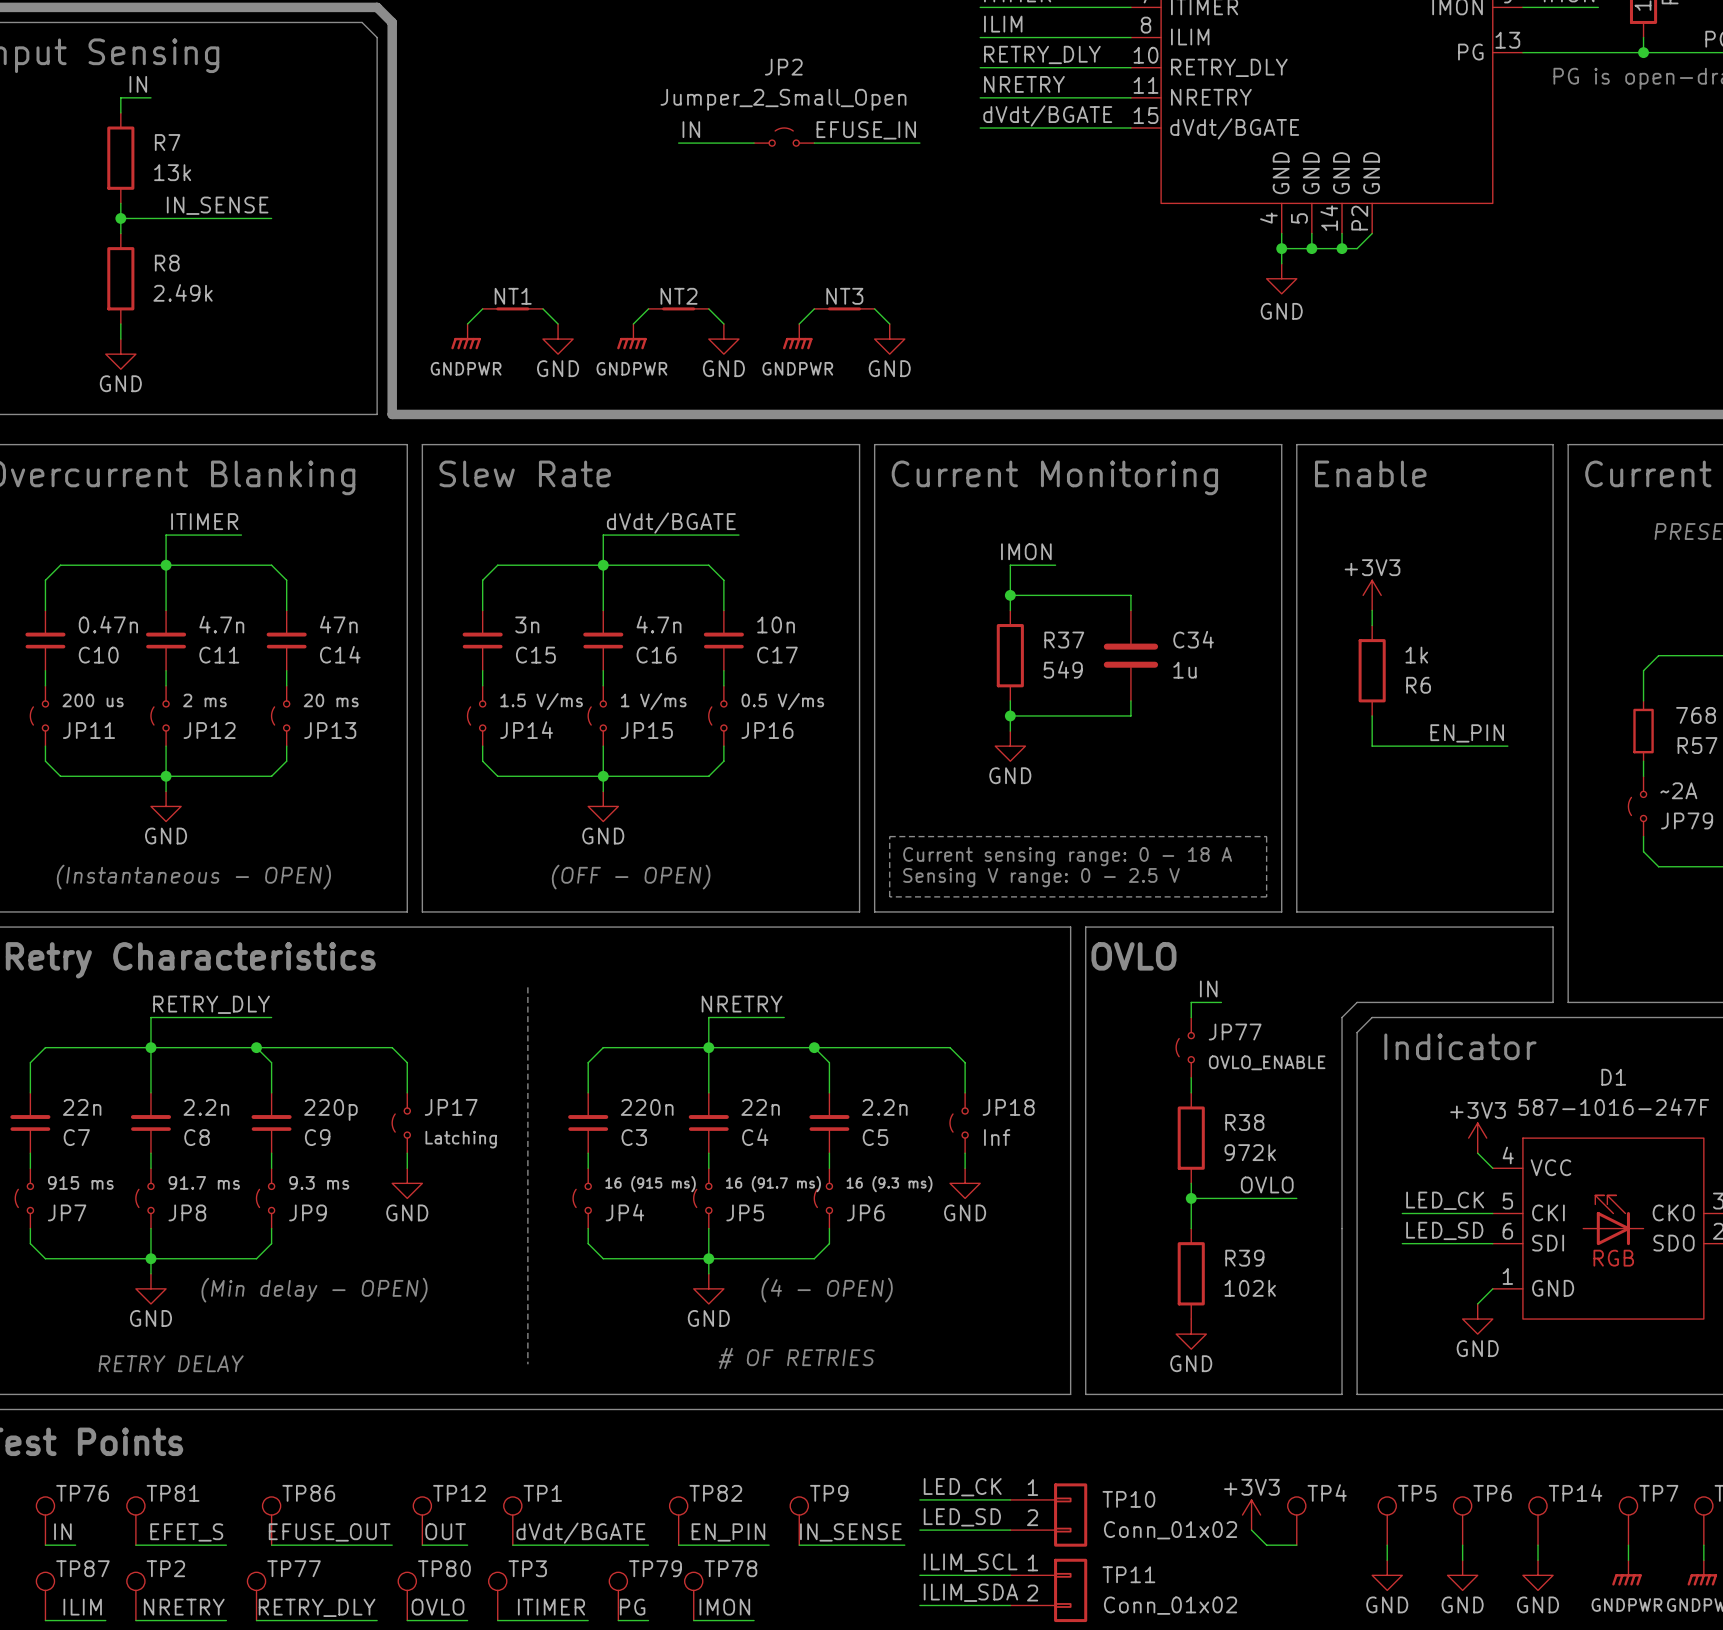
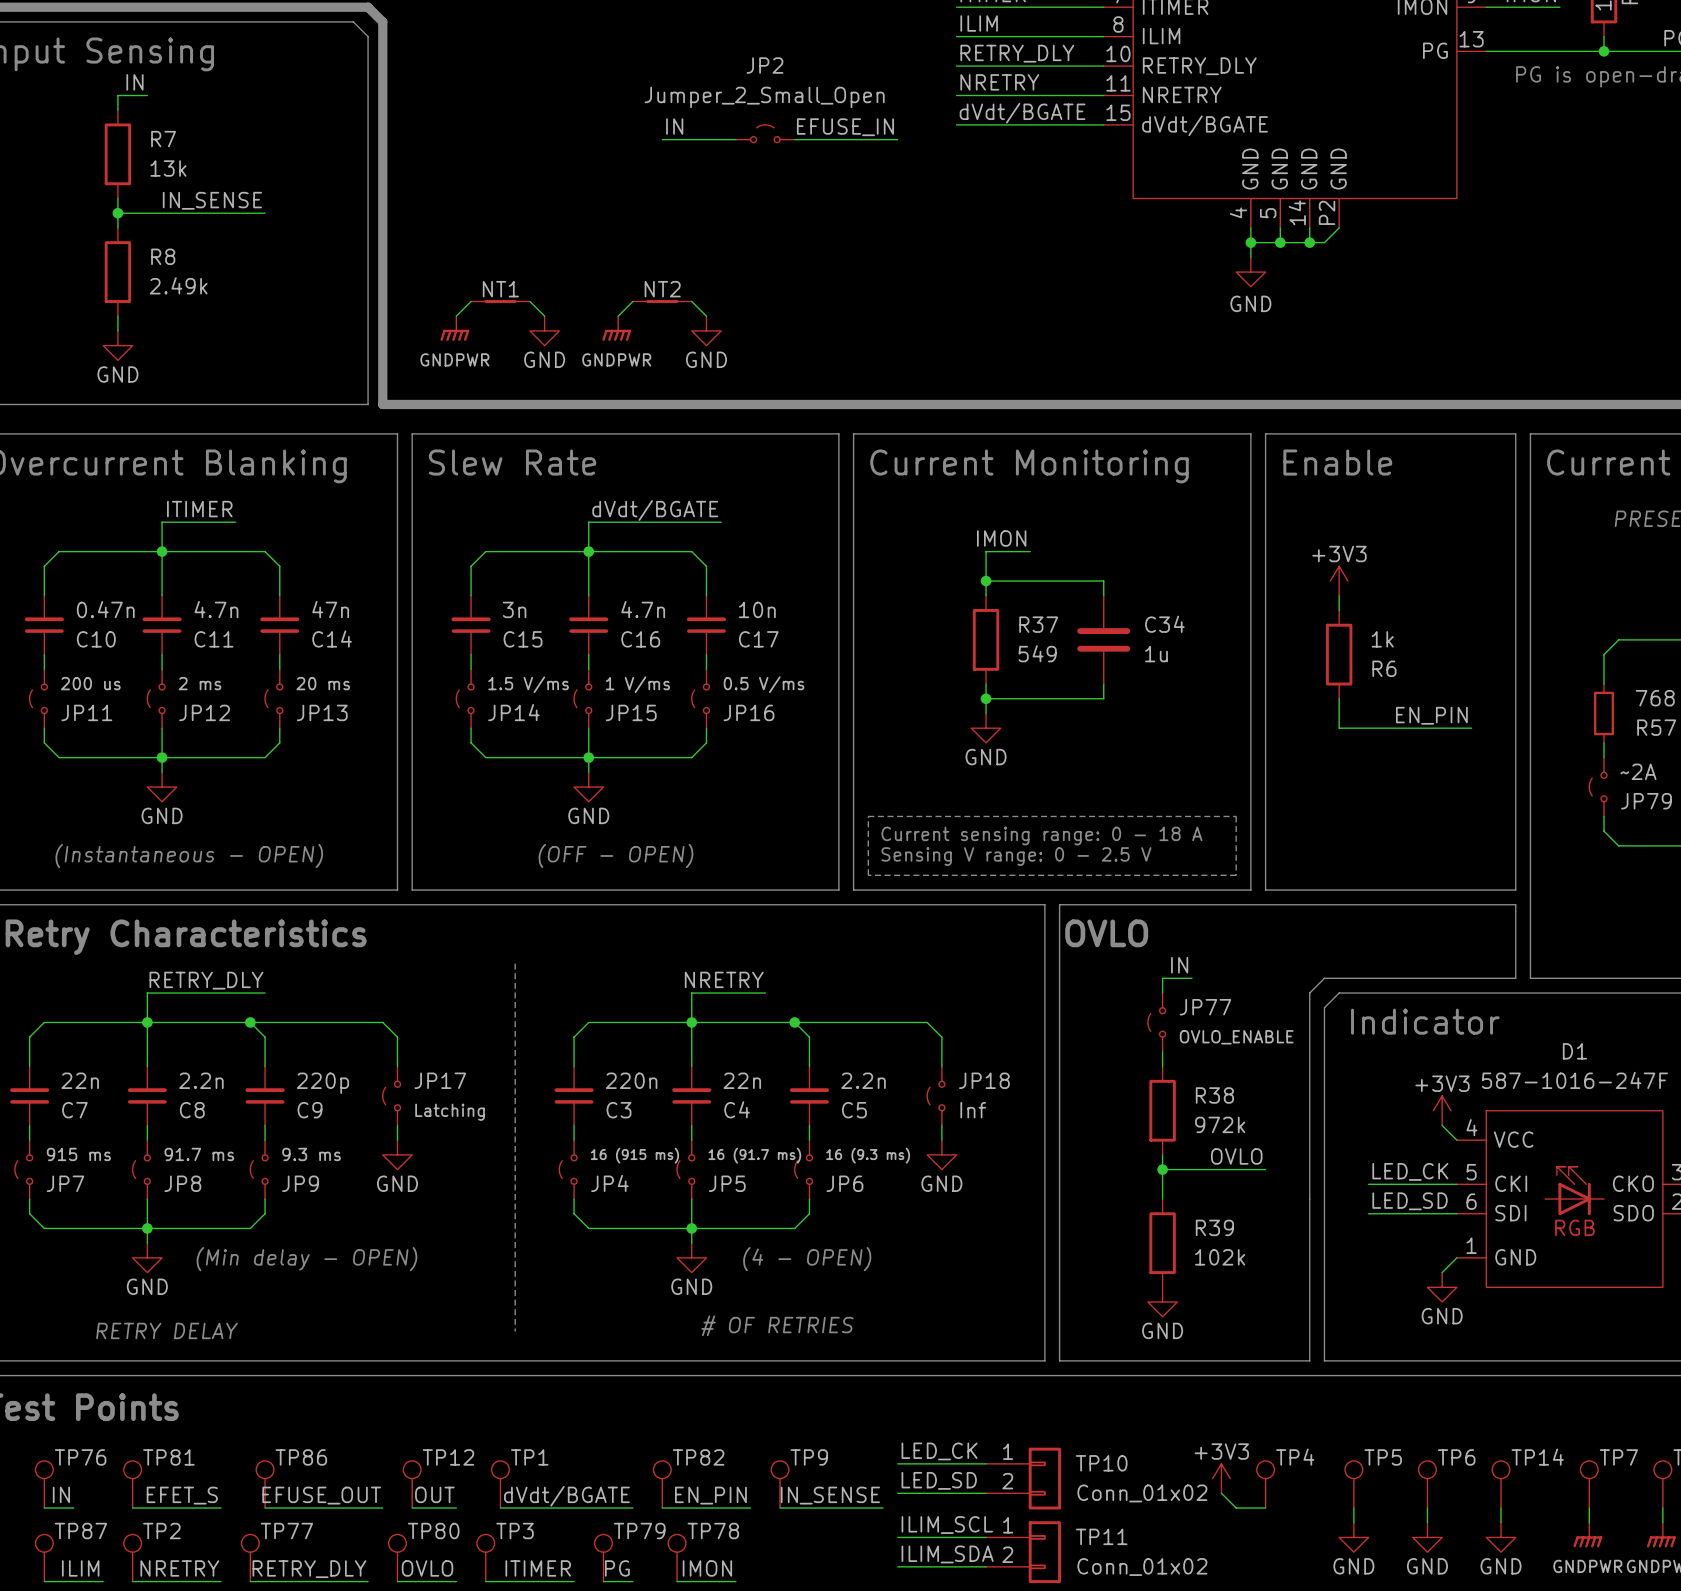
wire: (814, 308) (799, 323) -> none
NT3: (844, 308) -> none
wire: (874, 308) (889, 323) -> none
power symbol: GNDPWR (797, 336) -> none
power symbol: GND (889, 339) -> none

